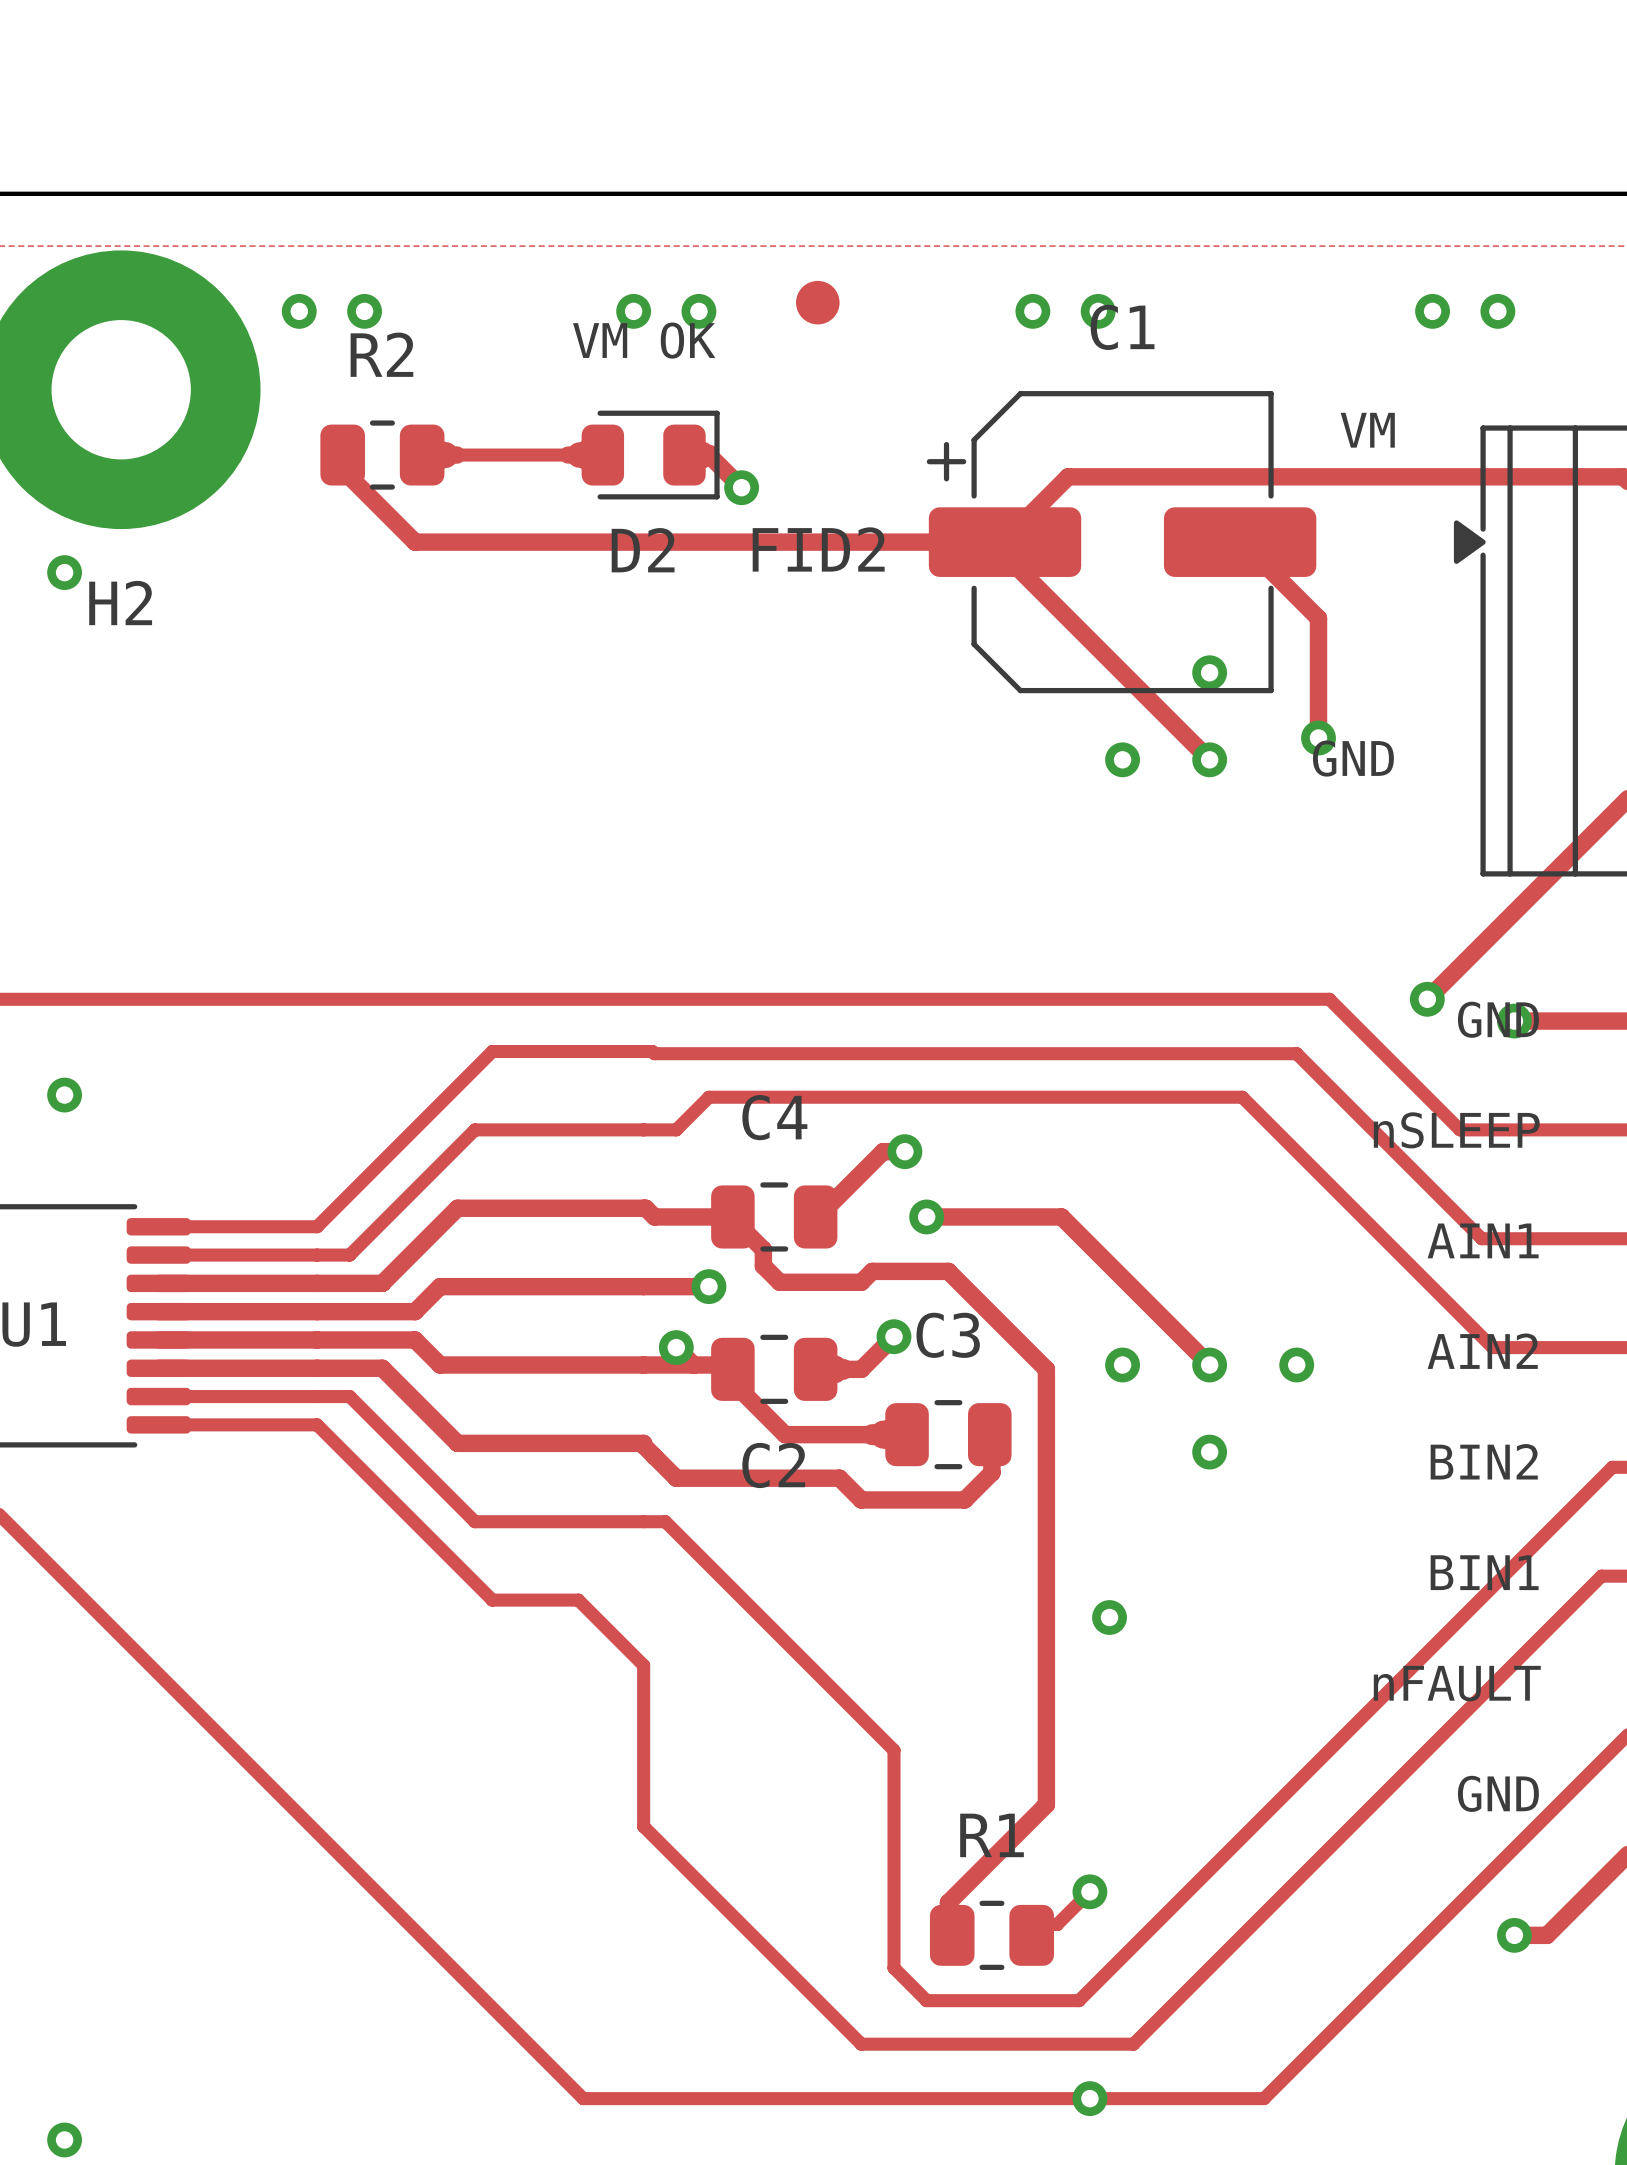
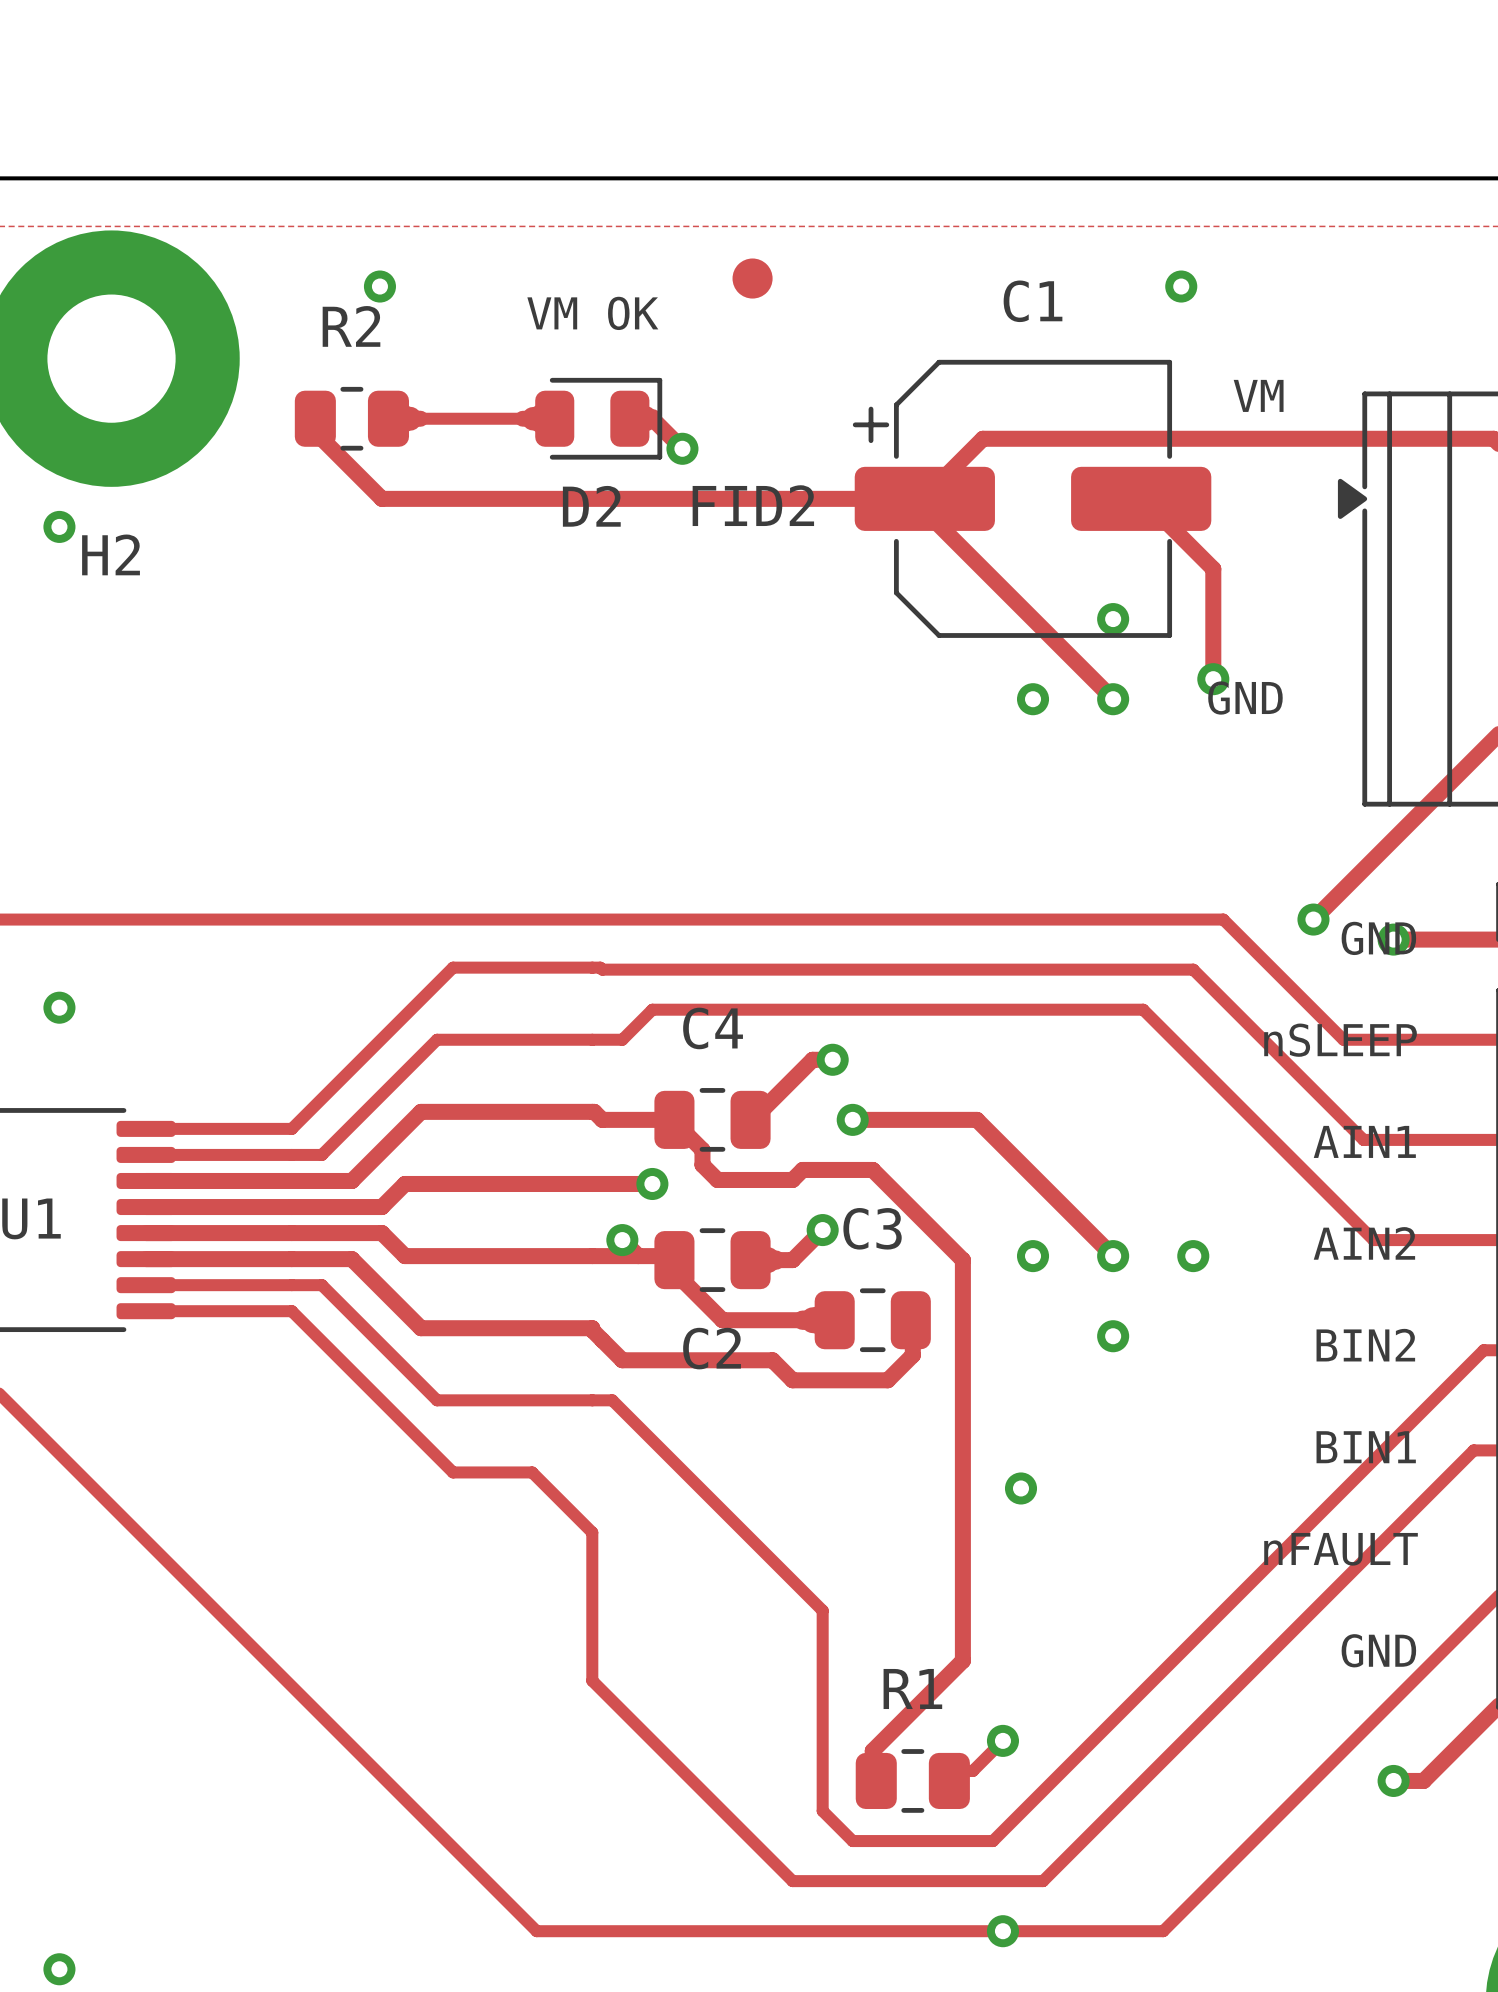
via: (299, 311) -> none
via position: (364, 311) -> (379, 286)
via: (633, 311) -> none
via: (698, 311) -> none
via: (1032, 311) -> none
via: (1098, 311) -> none
via: none -> (1181, 286)
via: (1432, 311) -> none
via: (1497, 311) -> none

